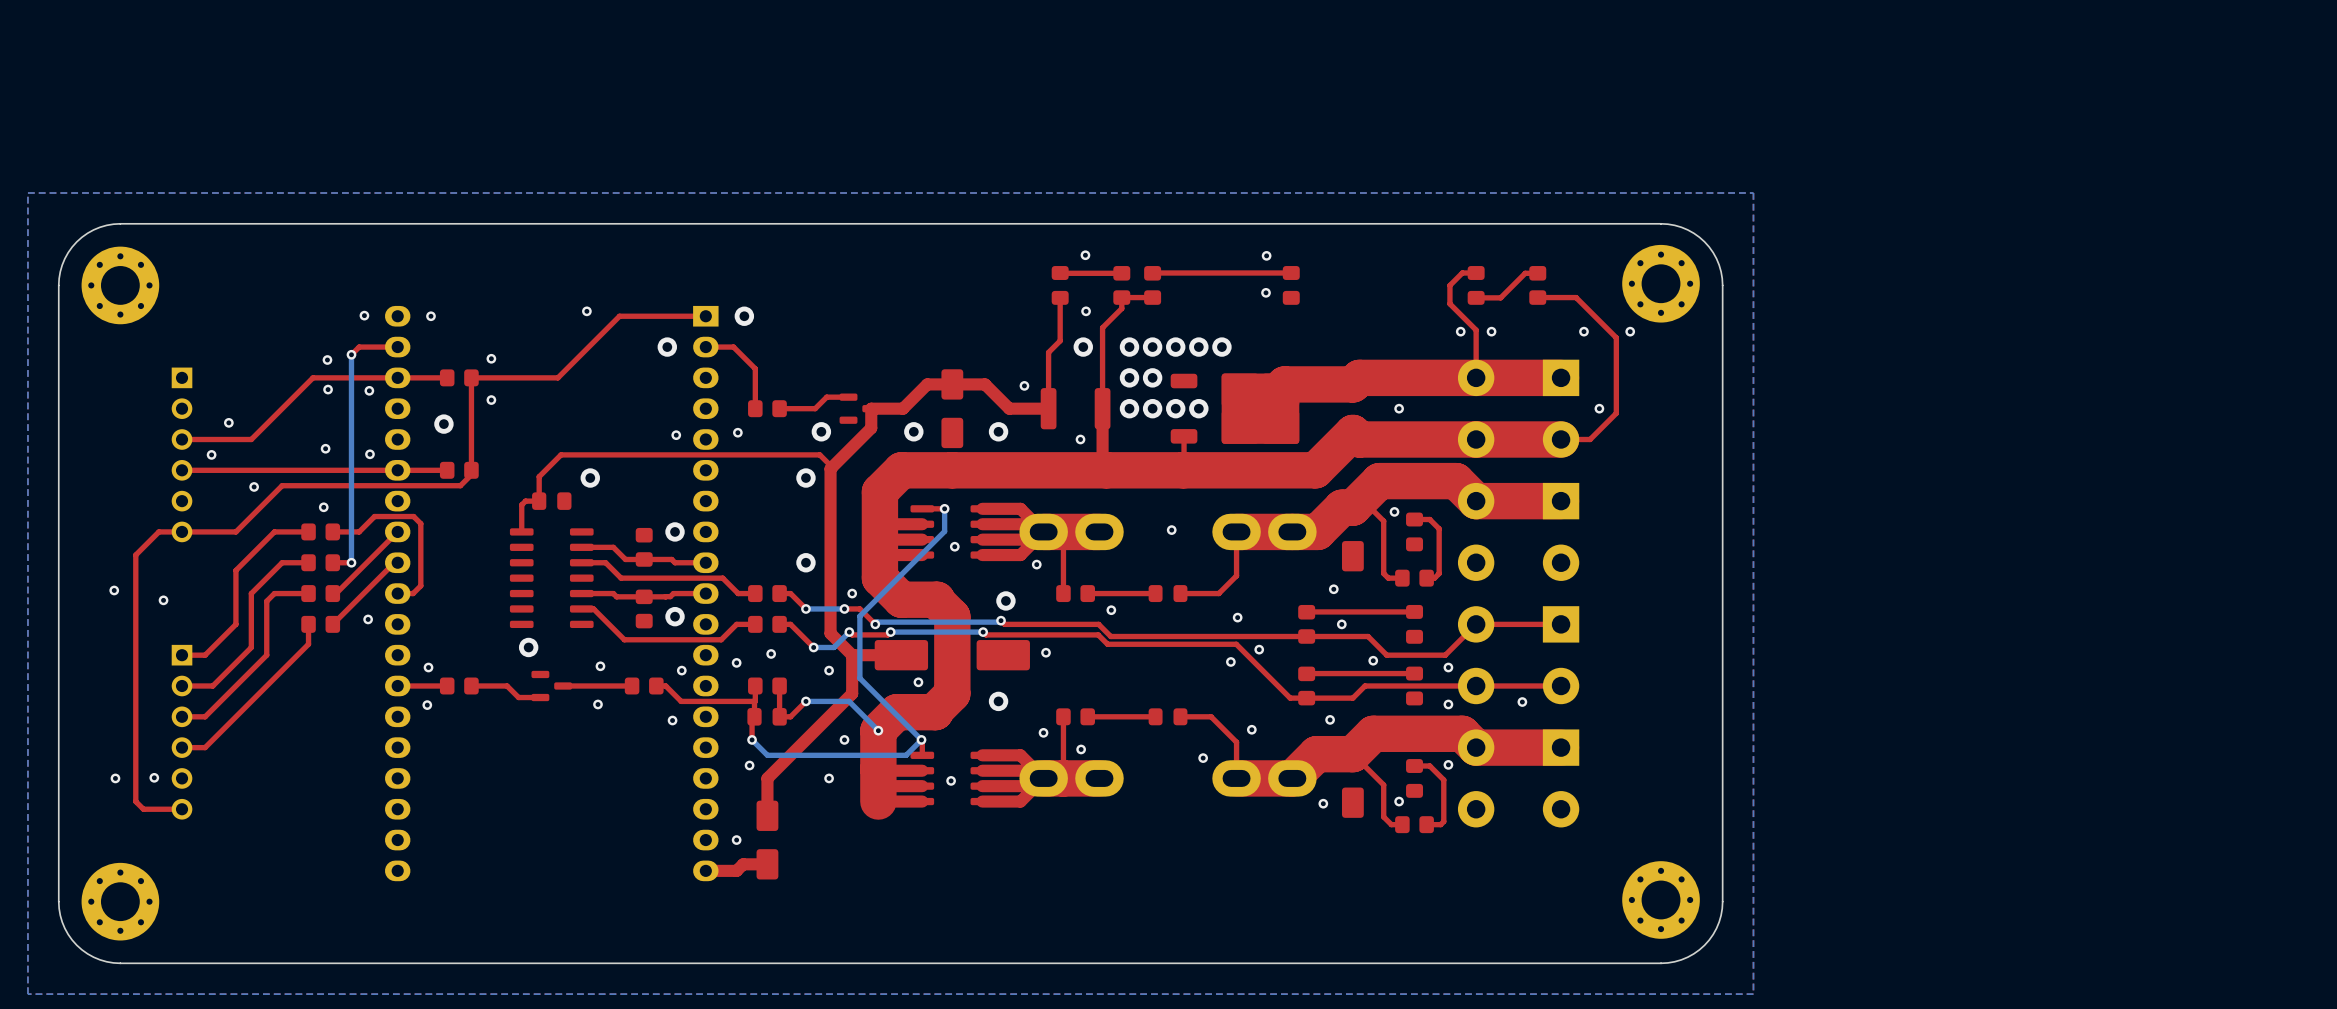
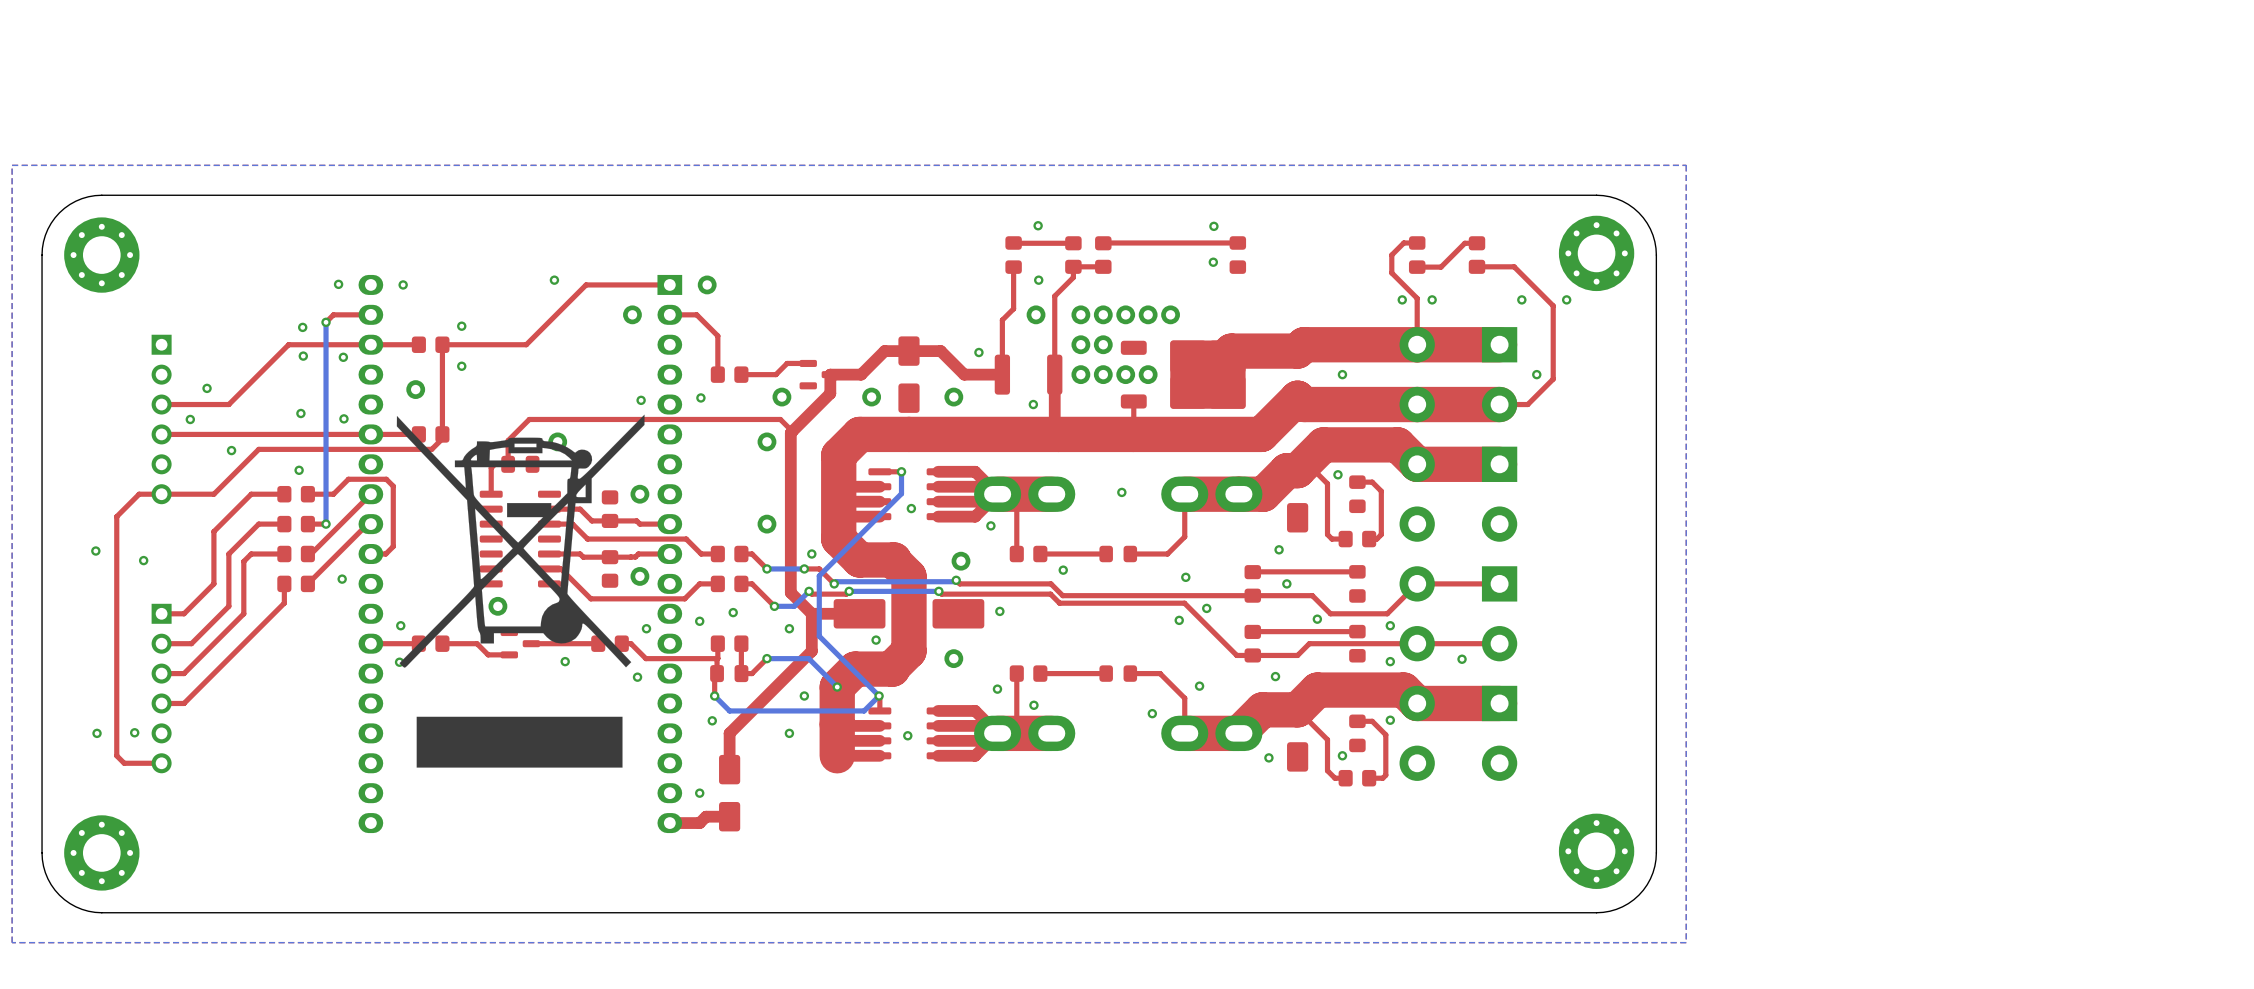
drawing: none -> [396, 414, 645, 768]

